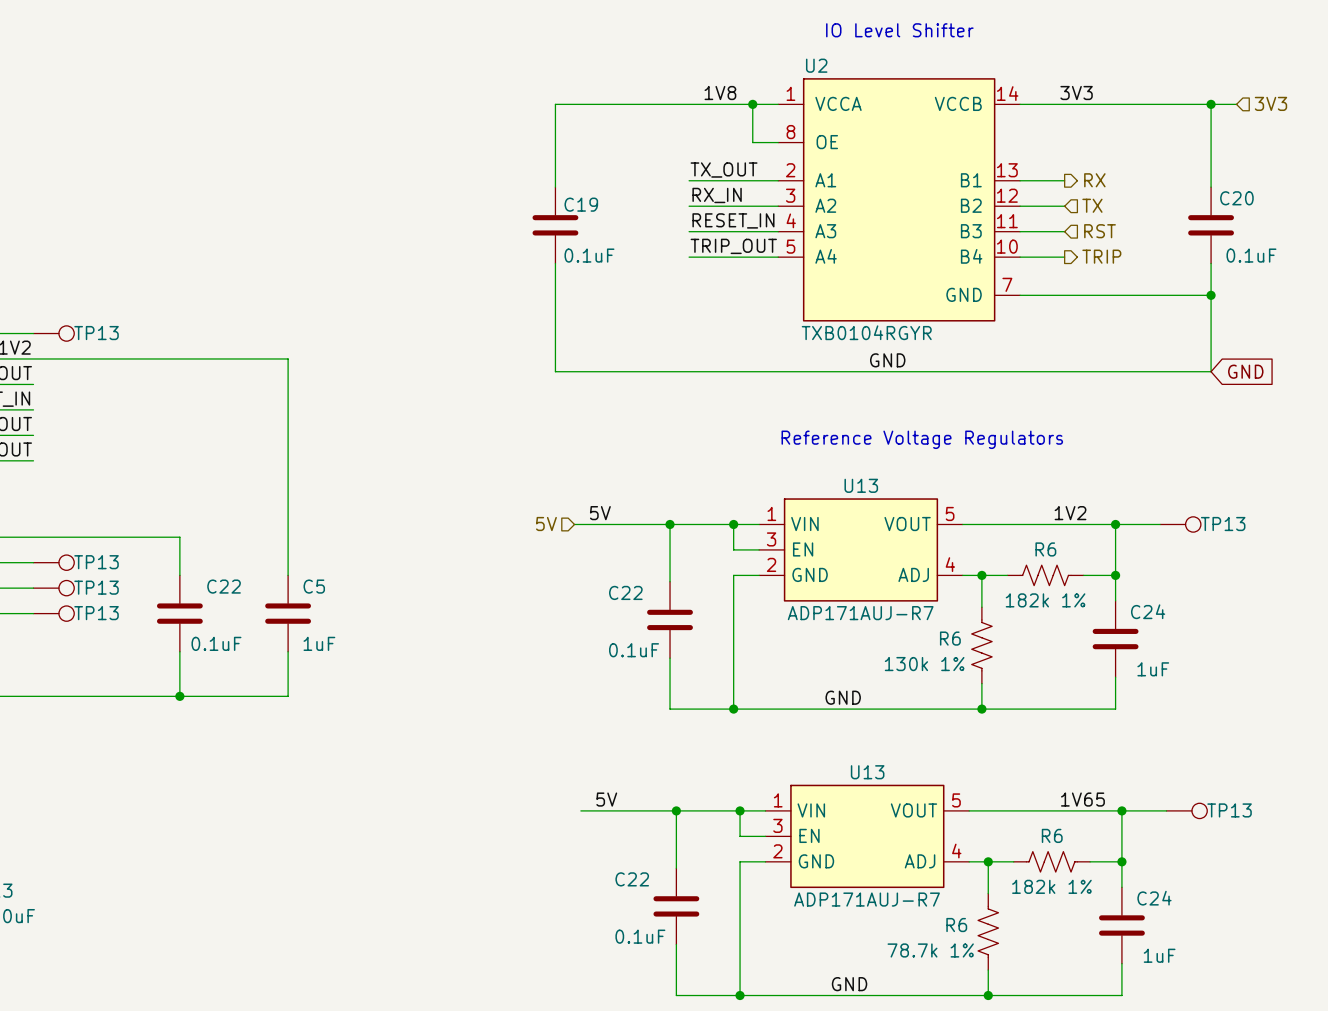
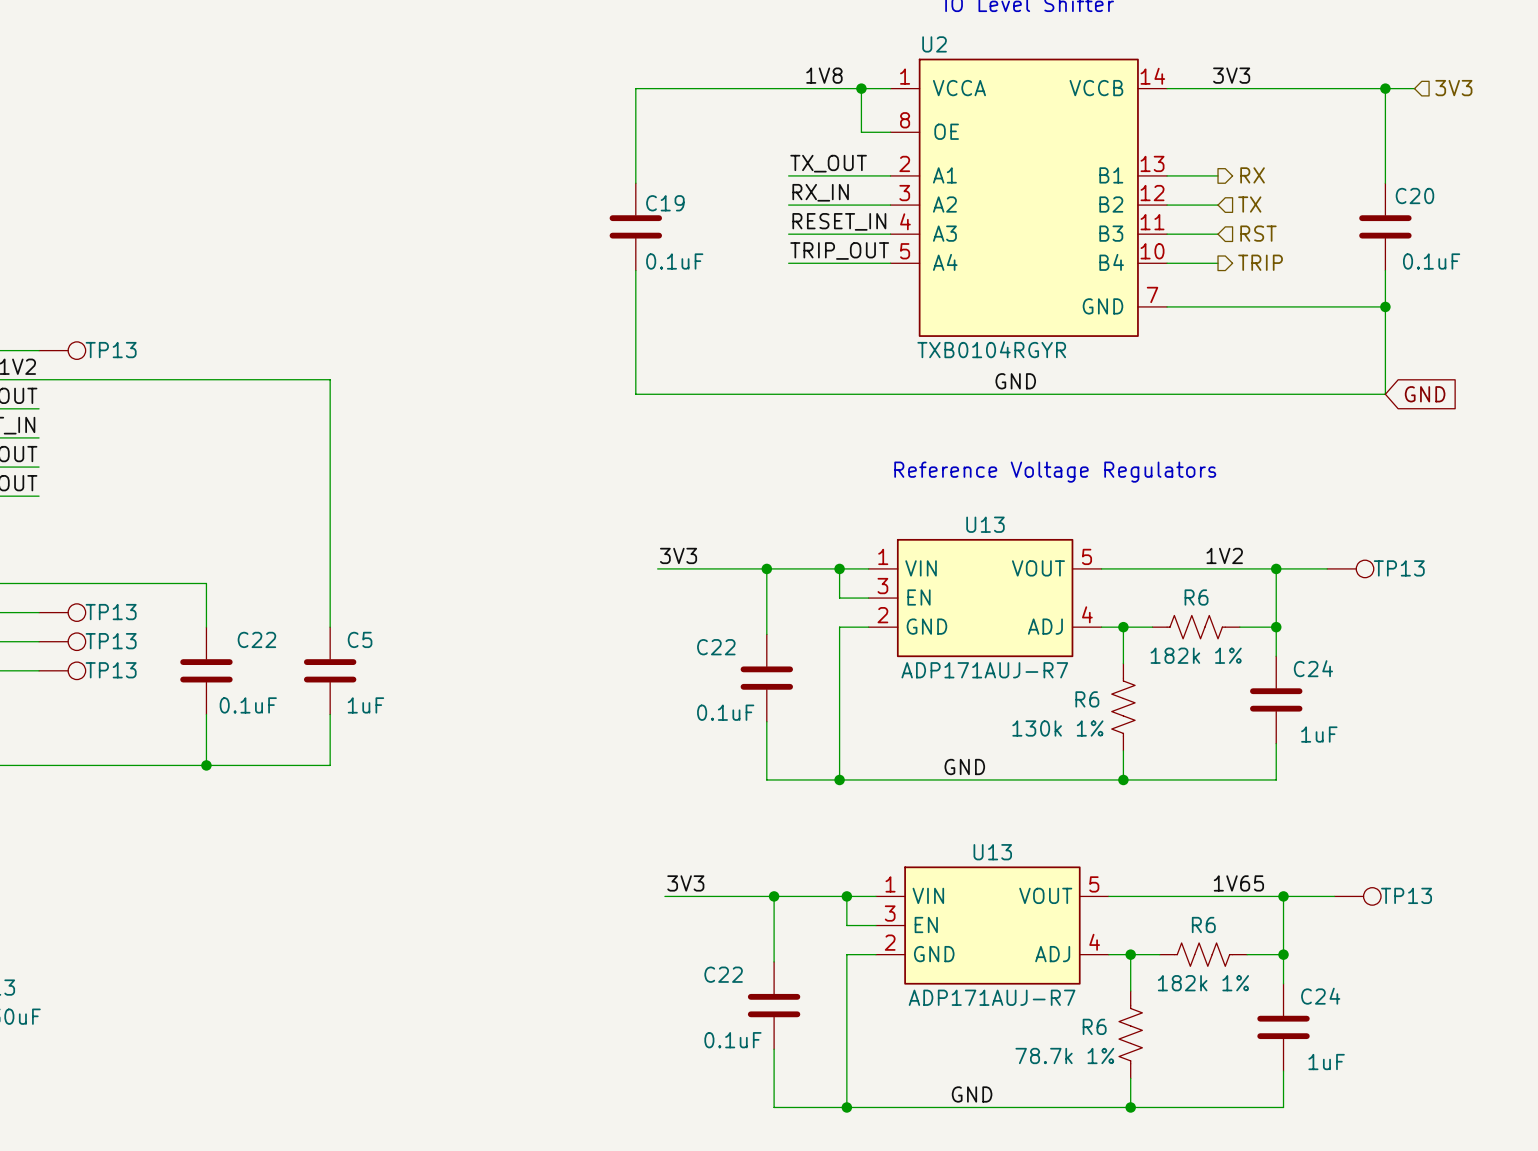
label: none -> 3V3 (678, 555)
label: 5V (600, 513) -> none
hierarchical label: 5V (546, 524) -> none
label: none -> 3V3 (685, 883)
label: 5V (606, 799) -> none

